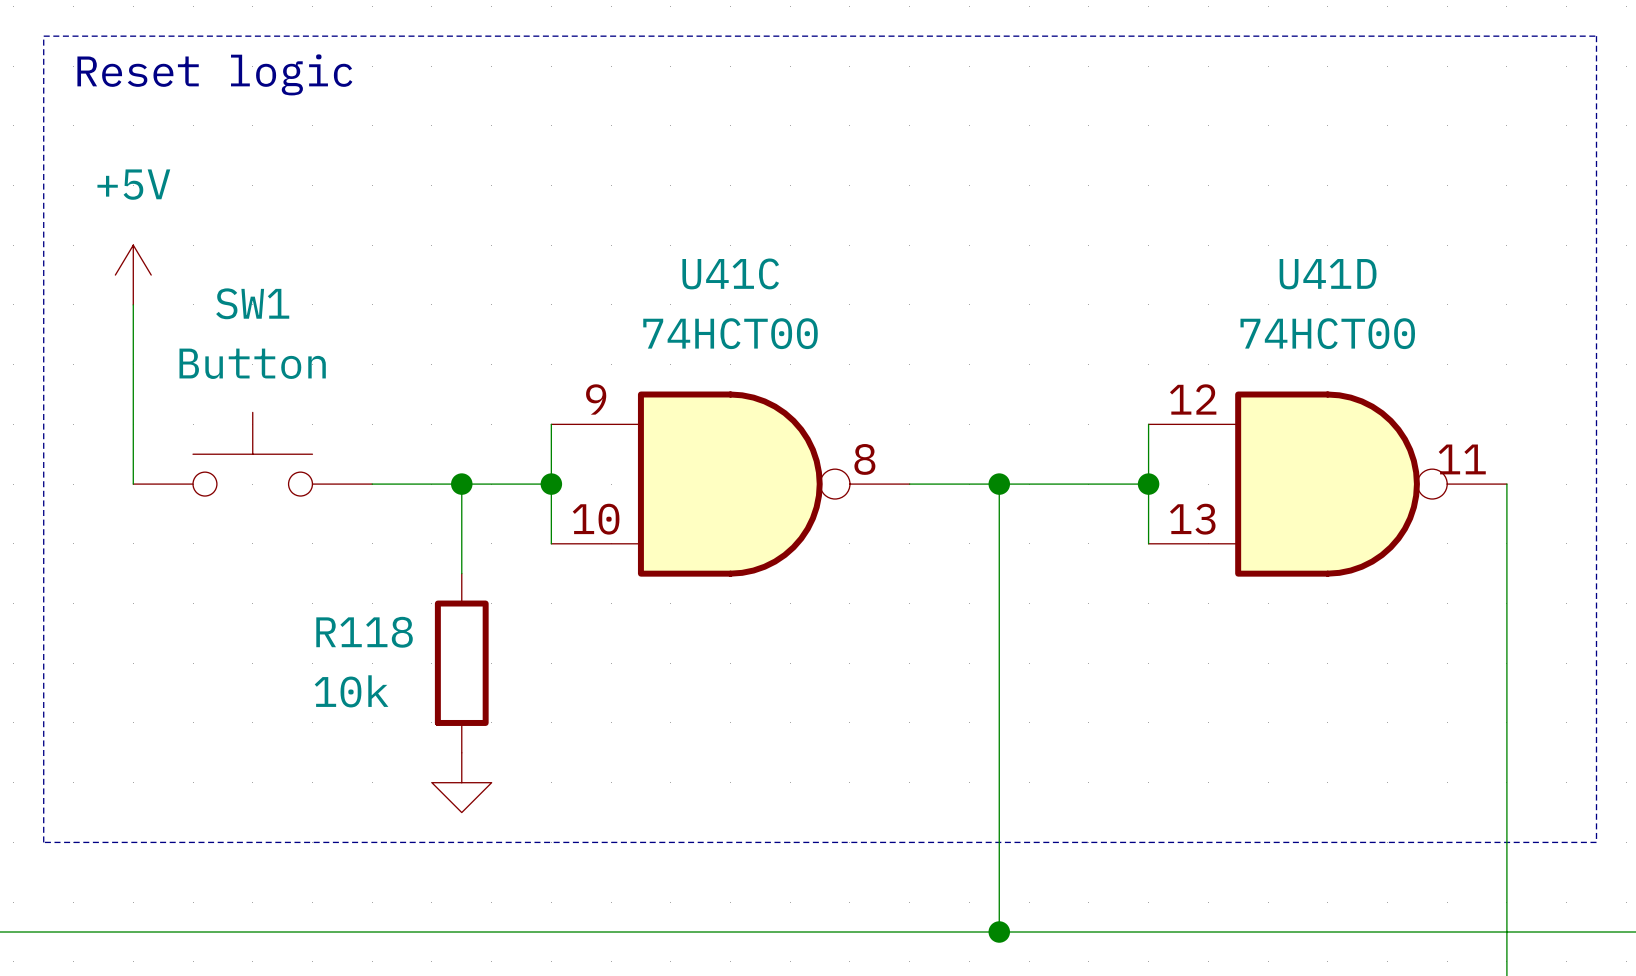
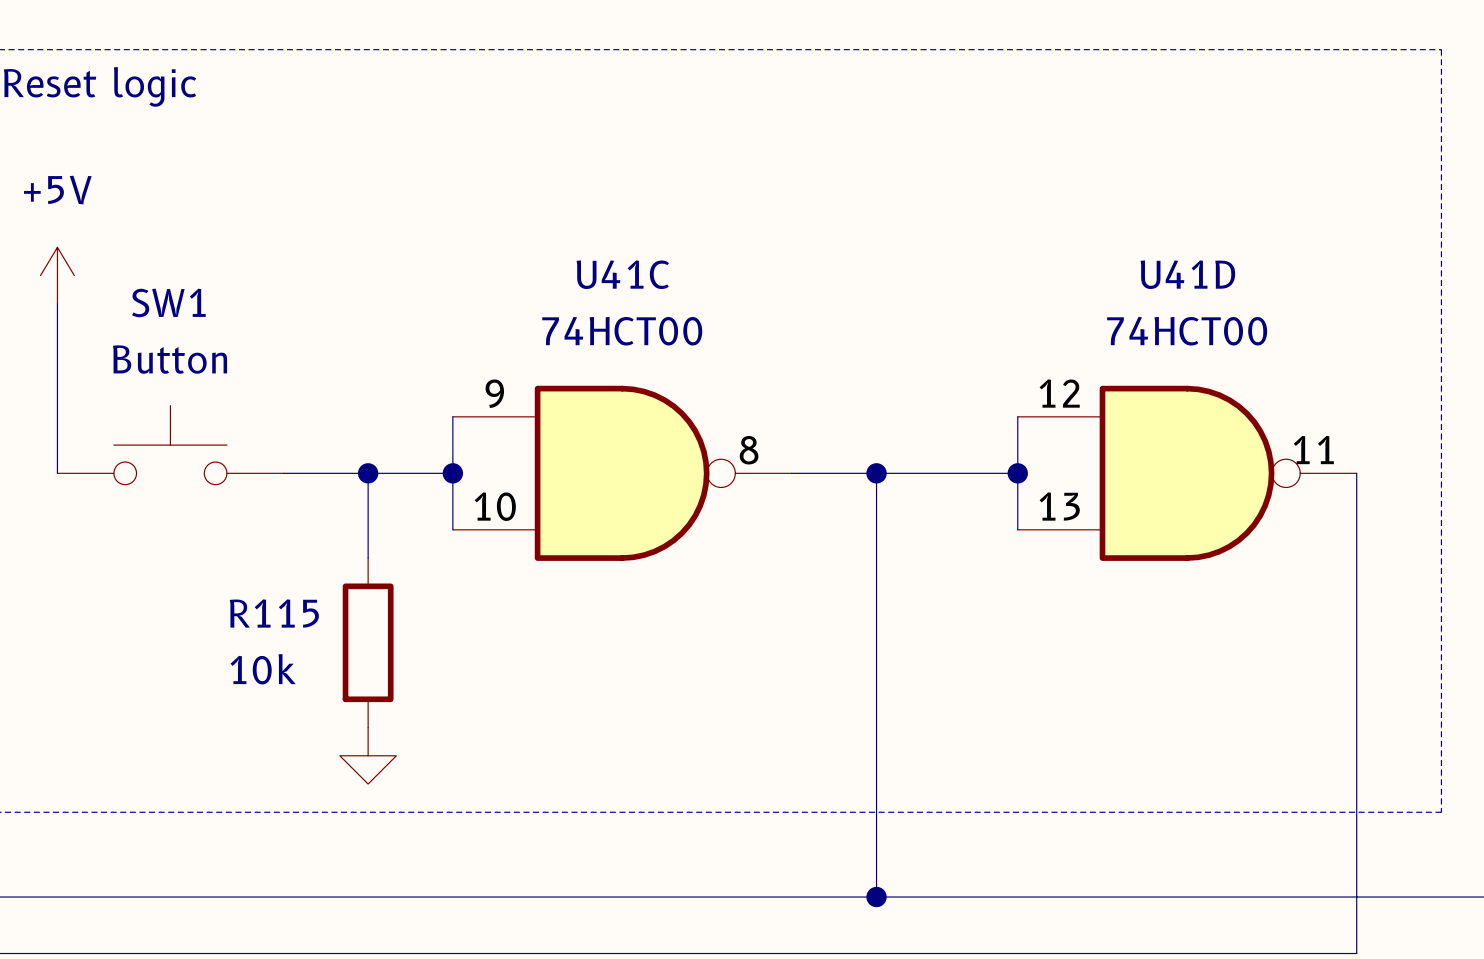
R118 name: R118 (364, 632) -> R115 (274, 613)

